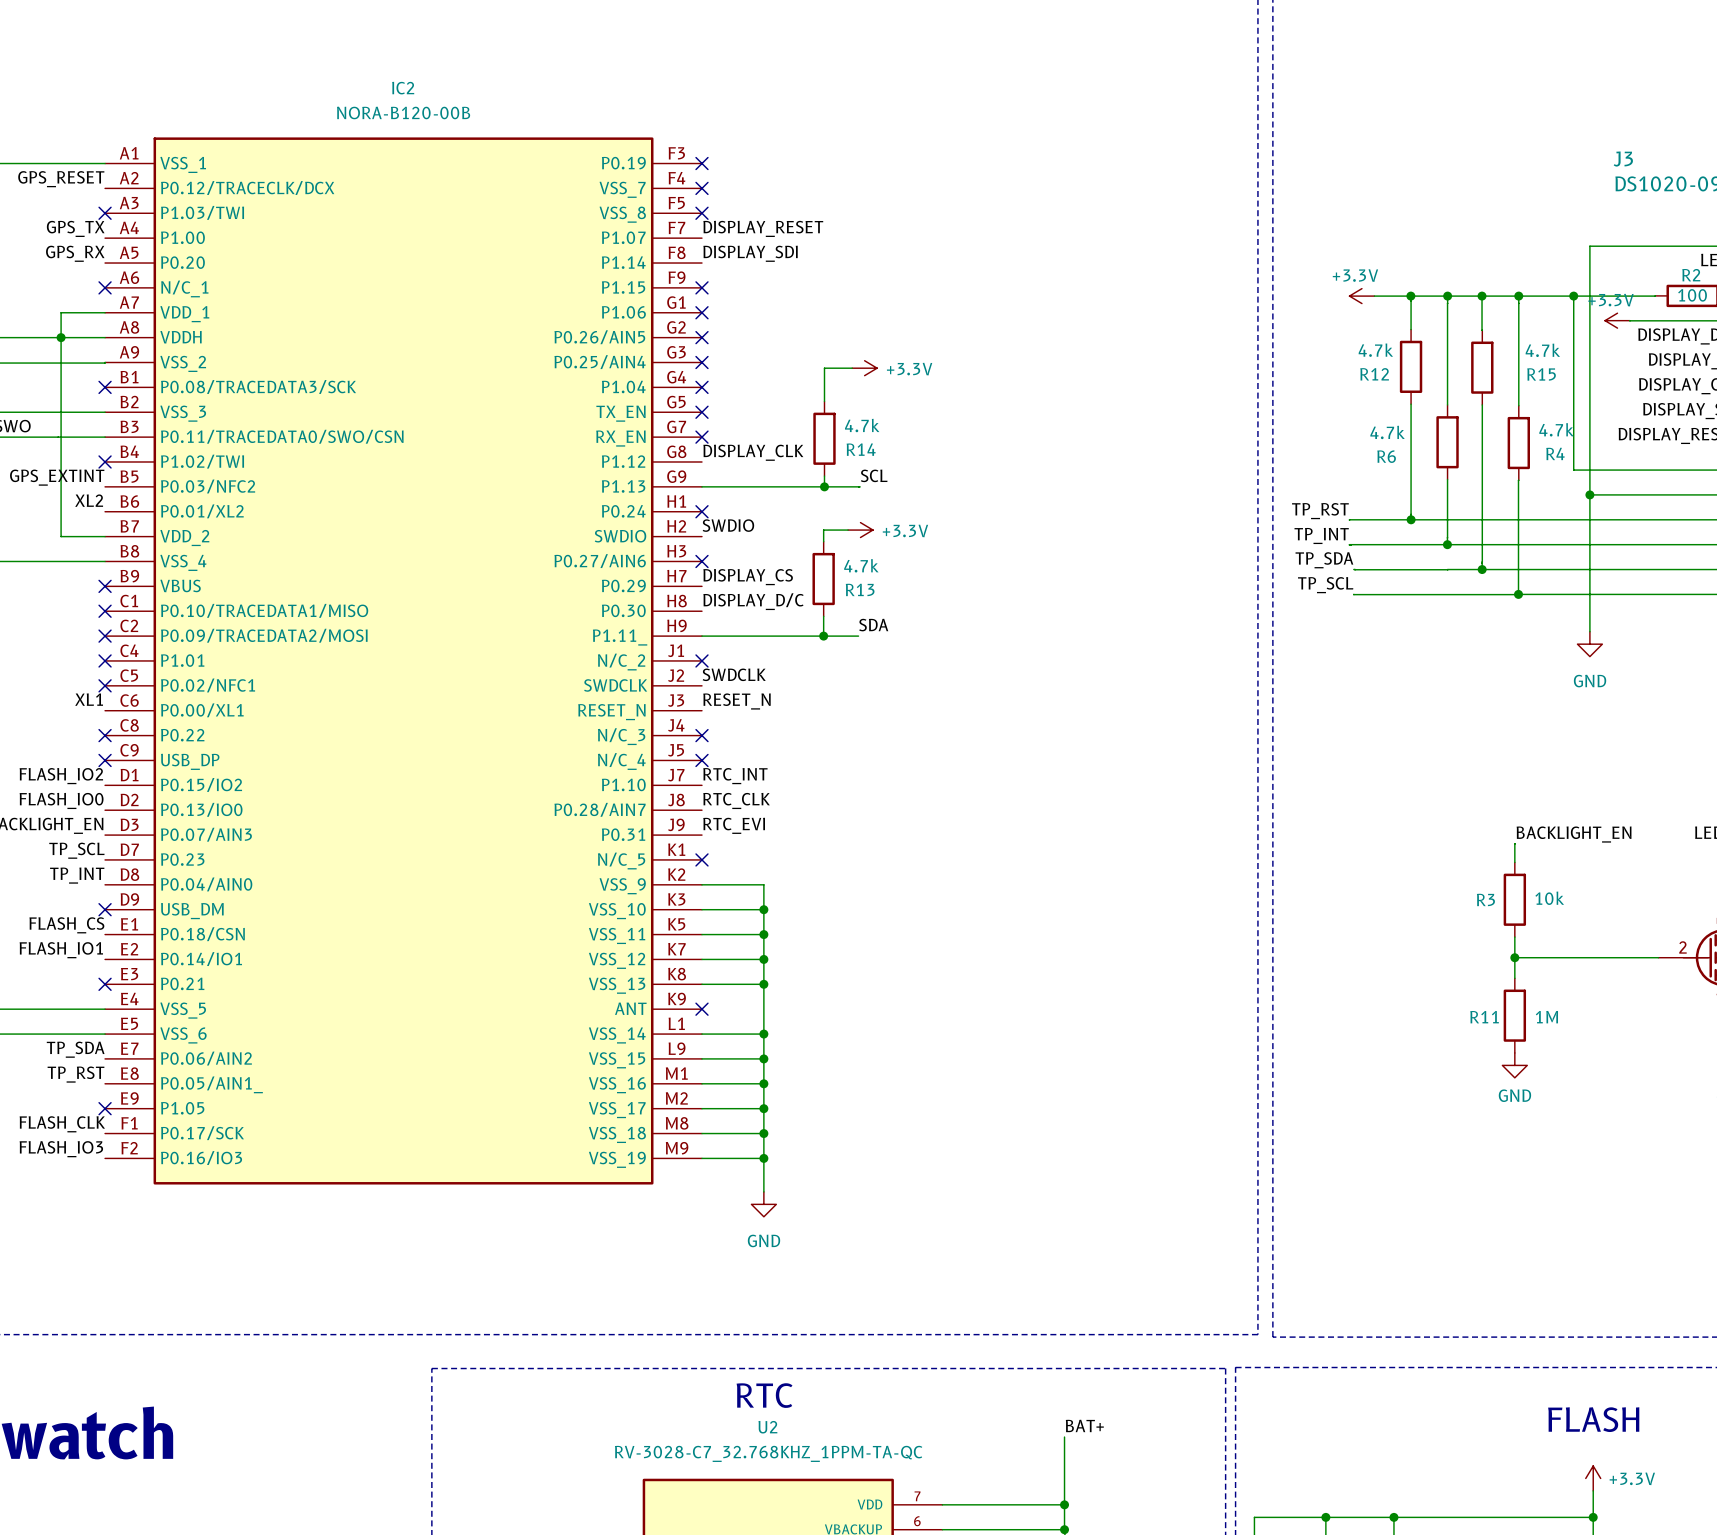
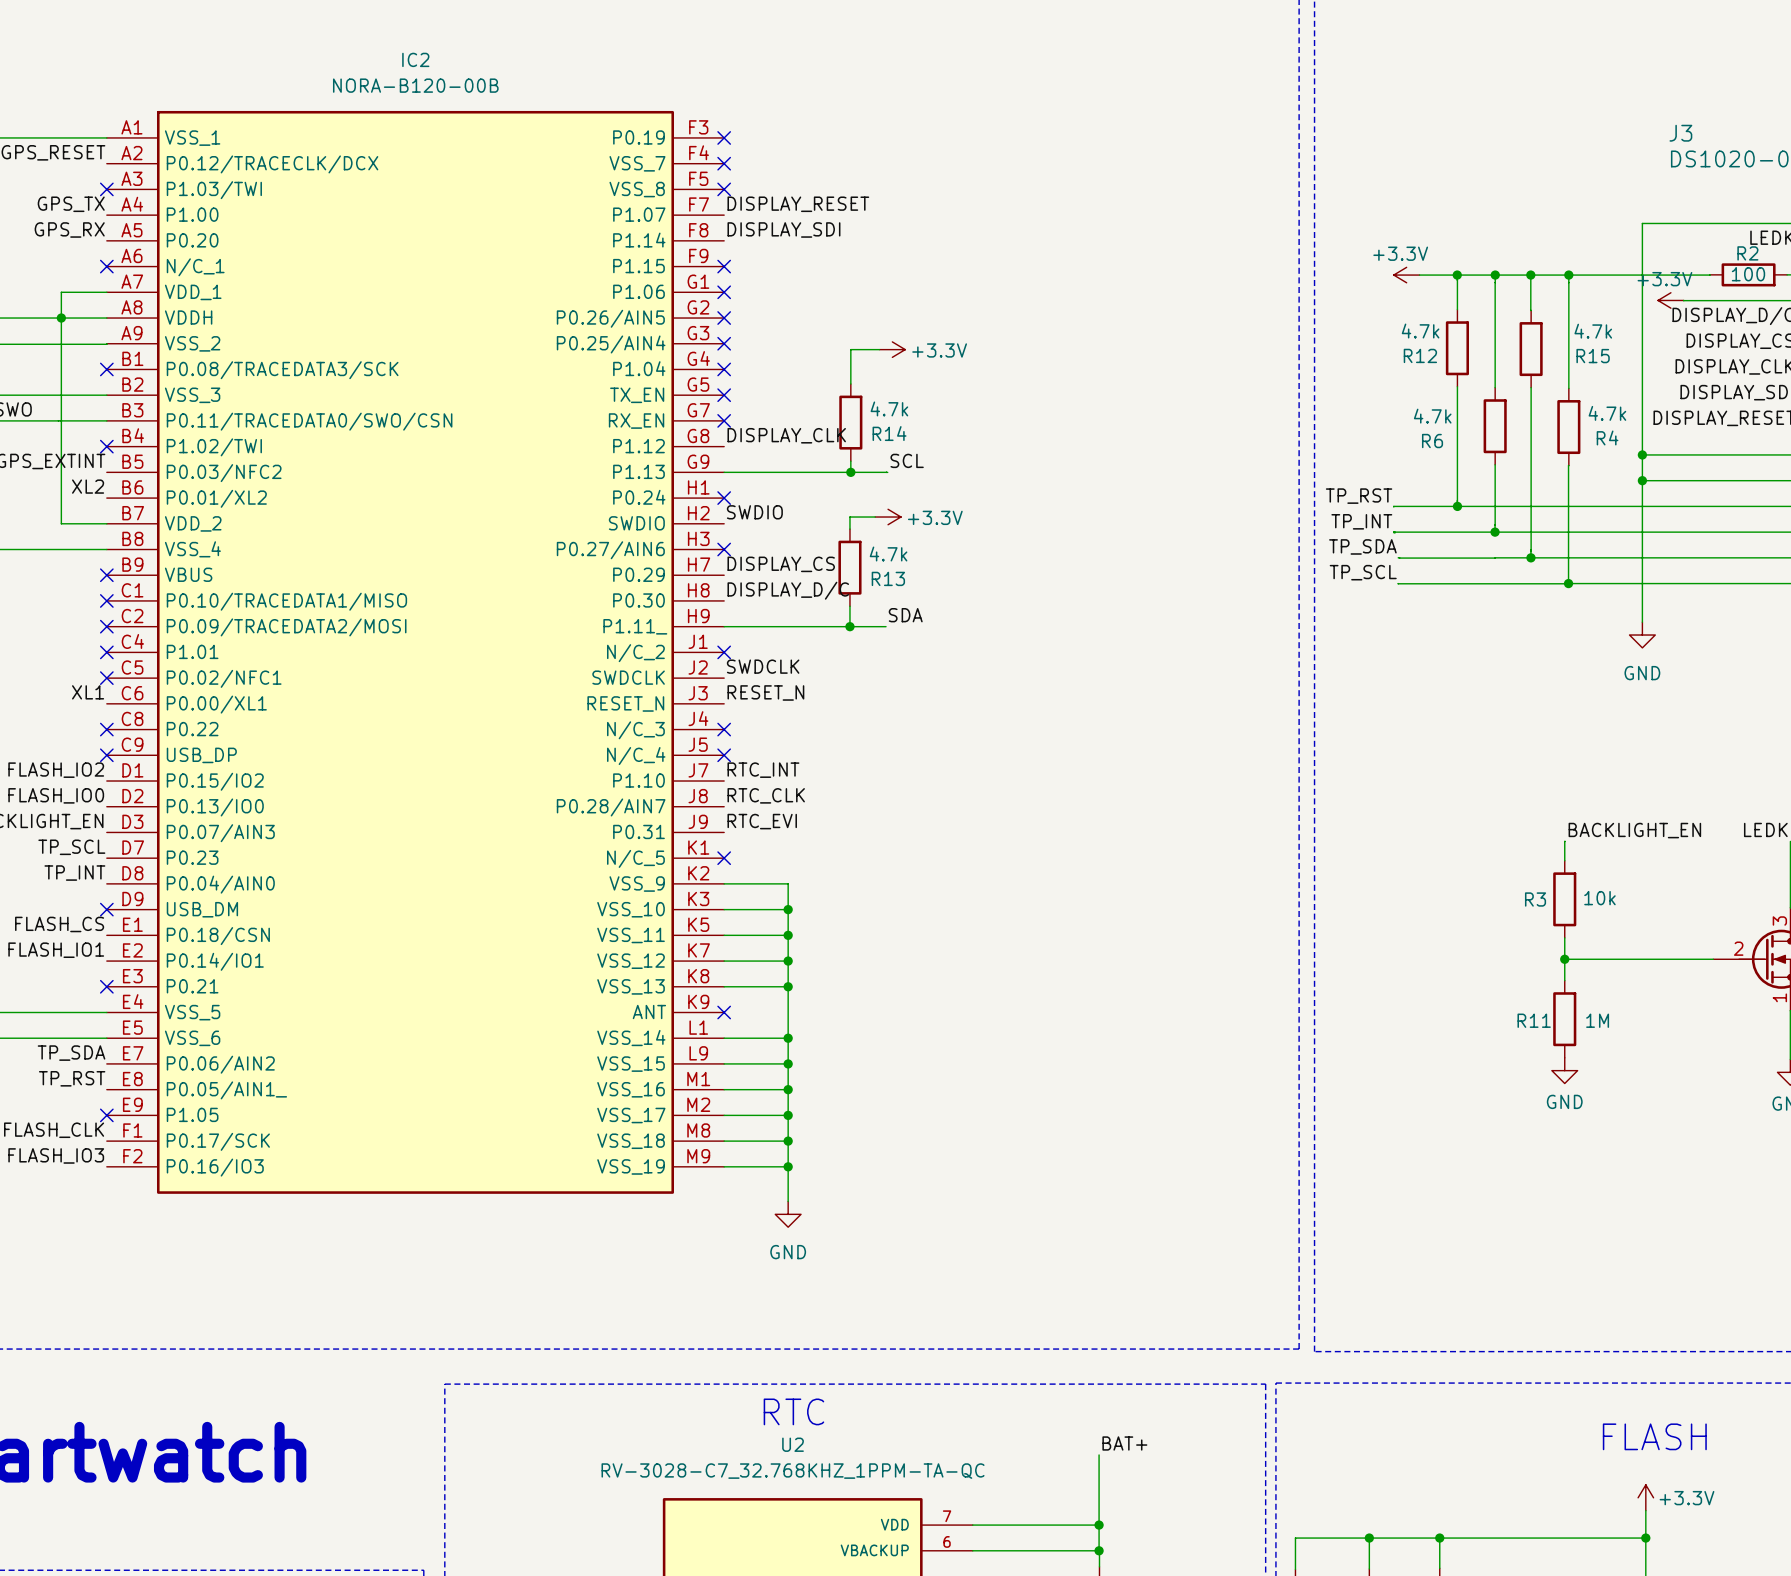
wire: (1573, 296) (1573, 470) (1589, 470) -> none
junction: (1573, 296) -> none
junction: none -> (1642, 454)

